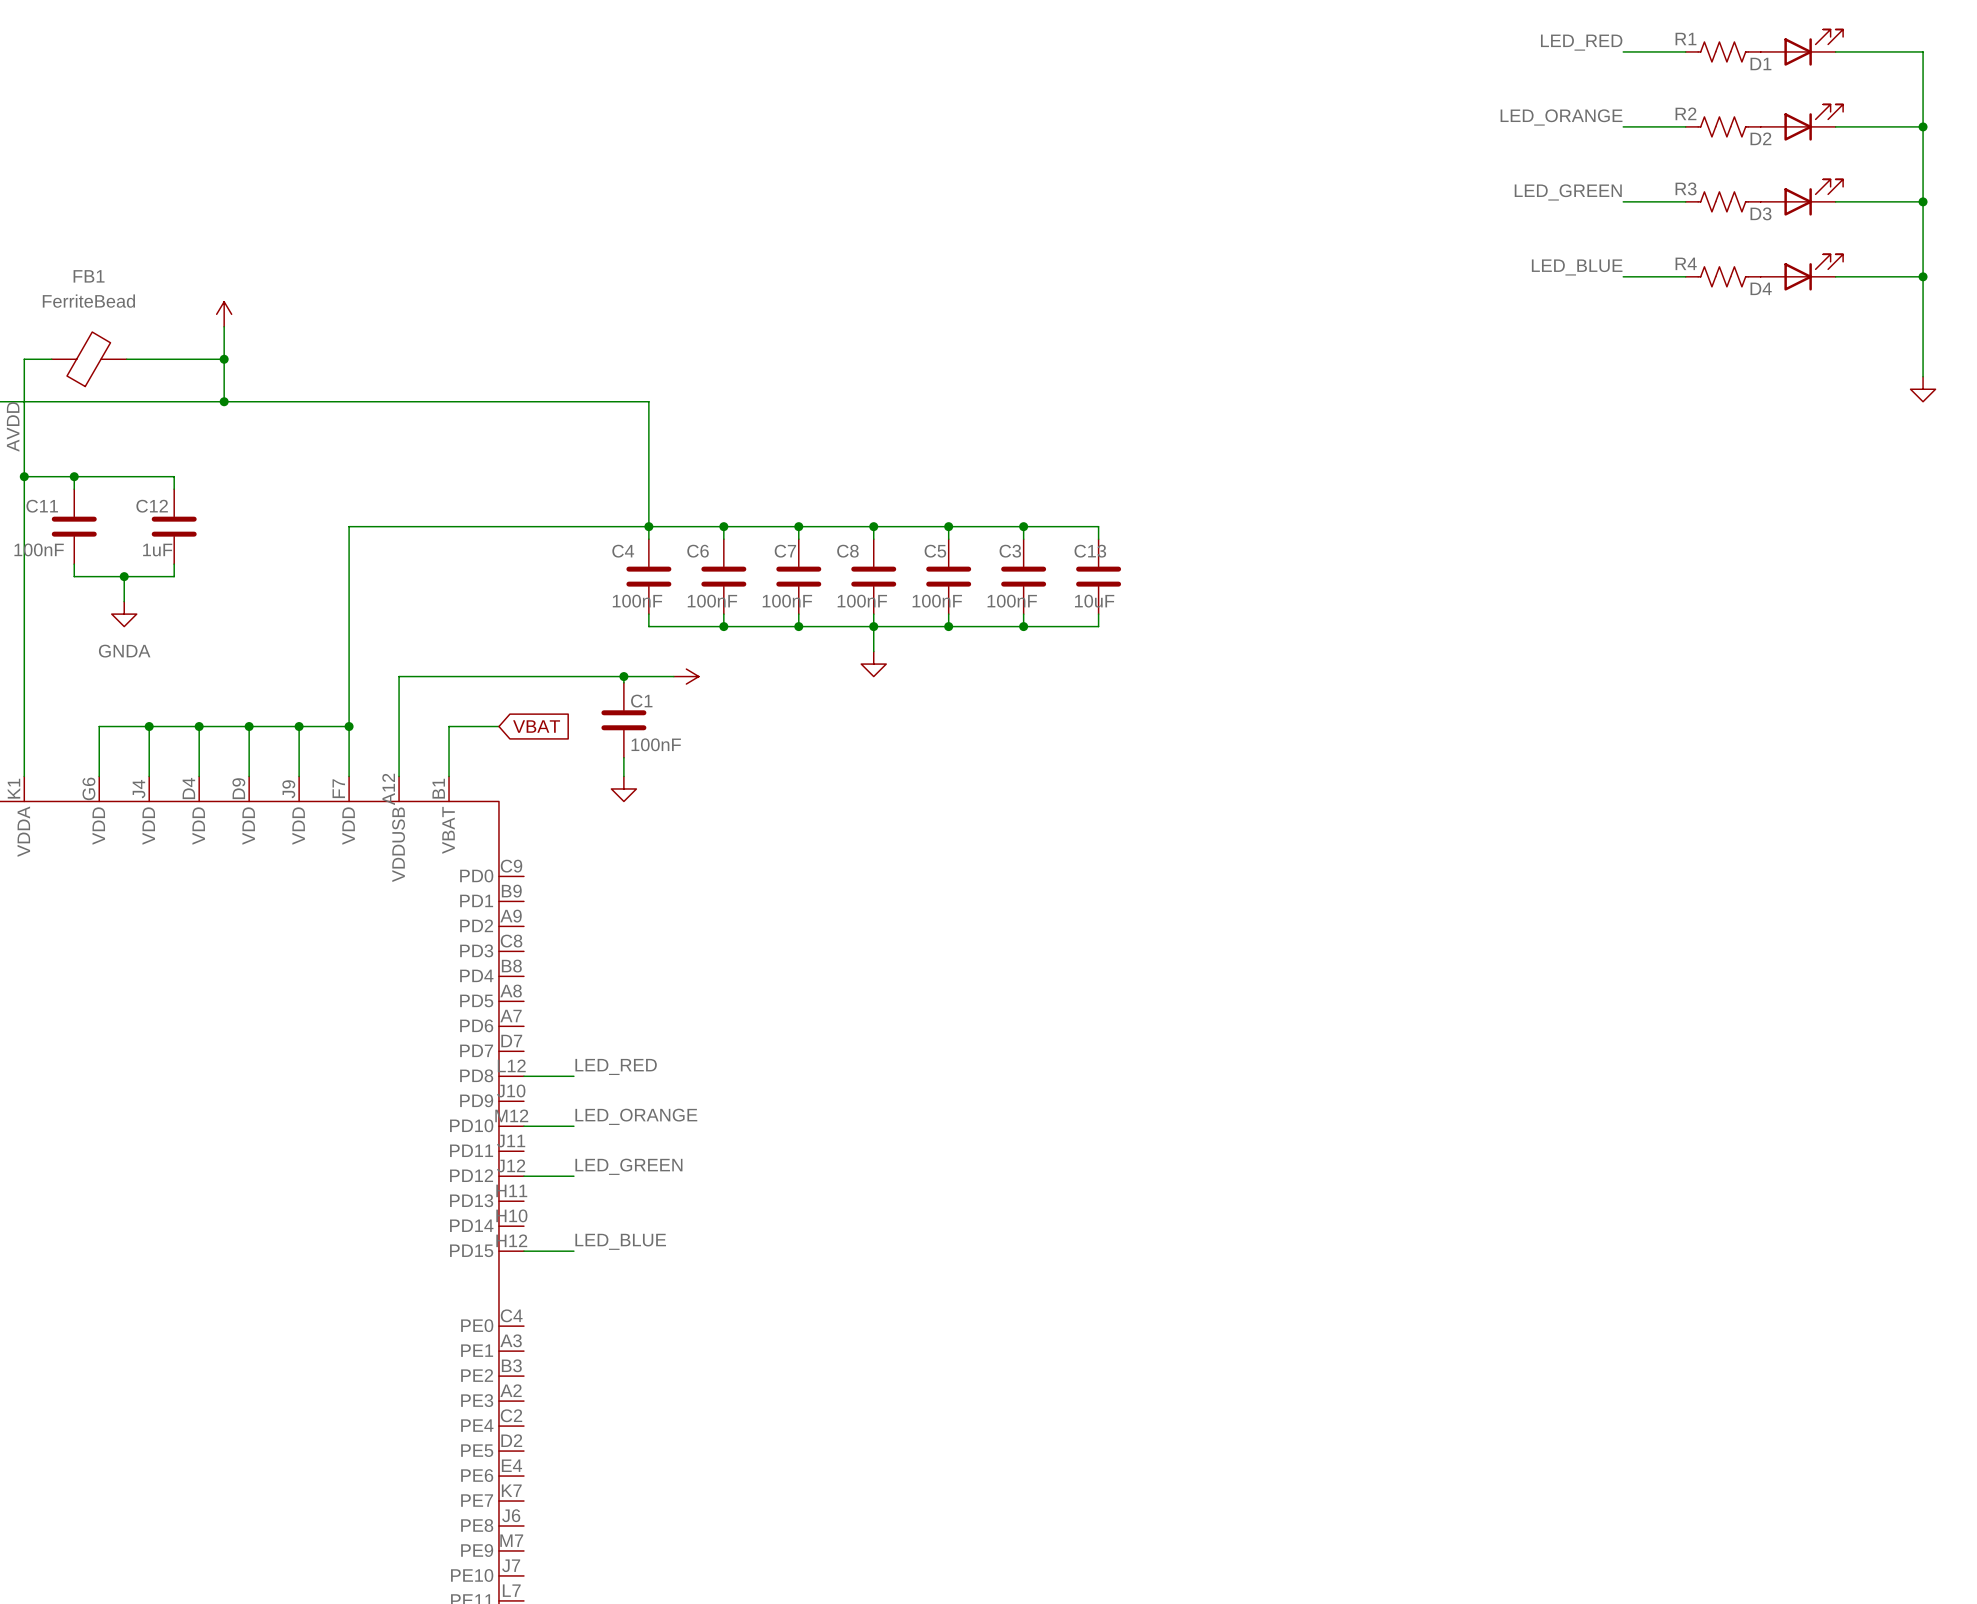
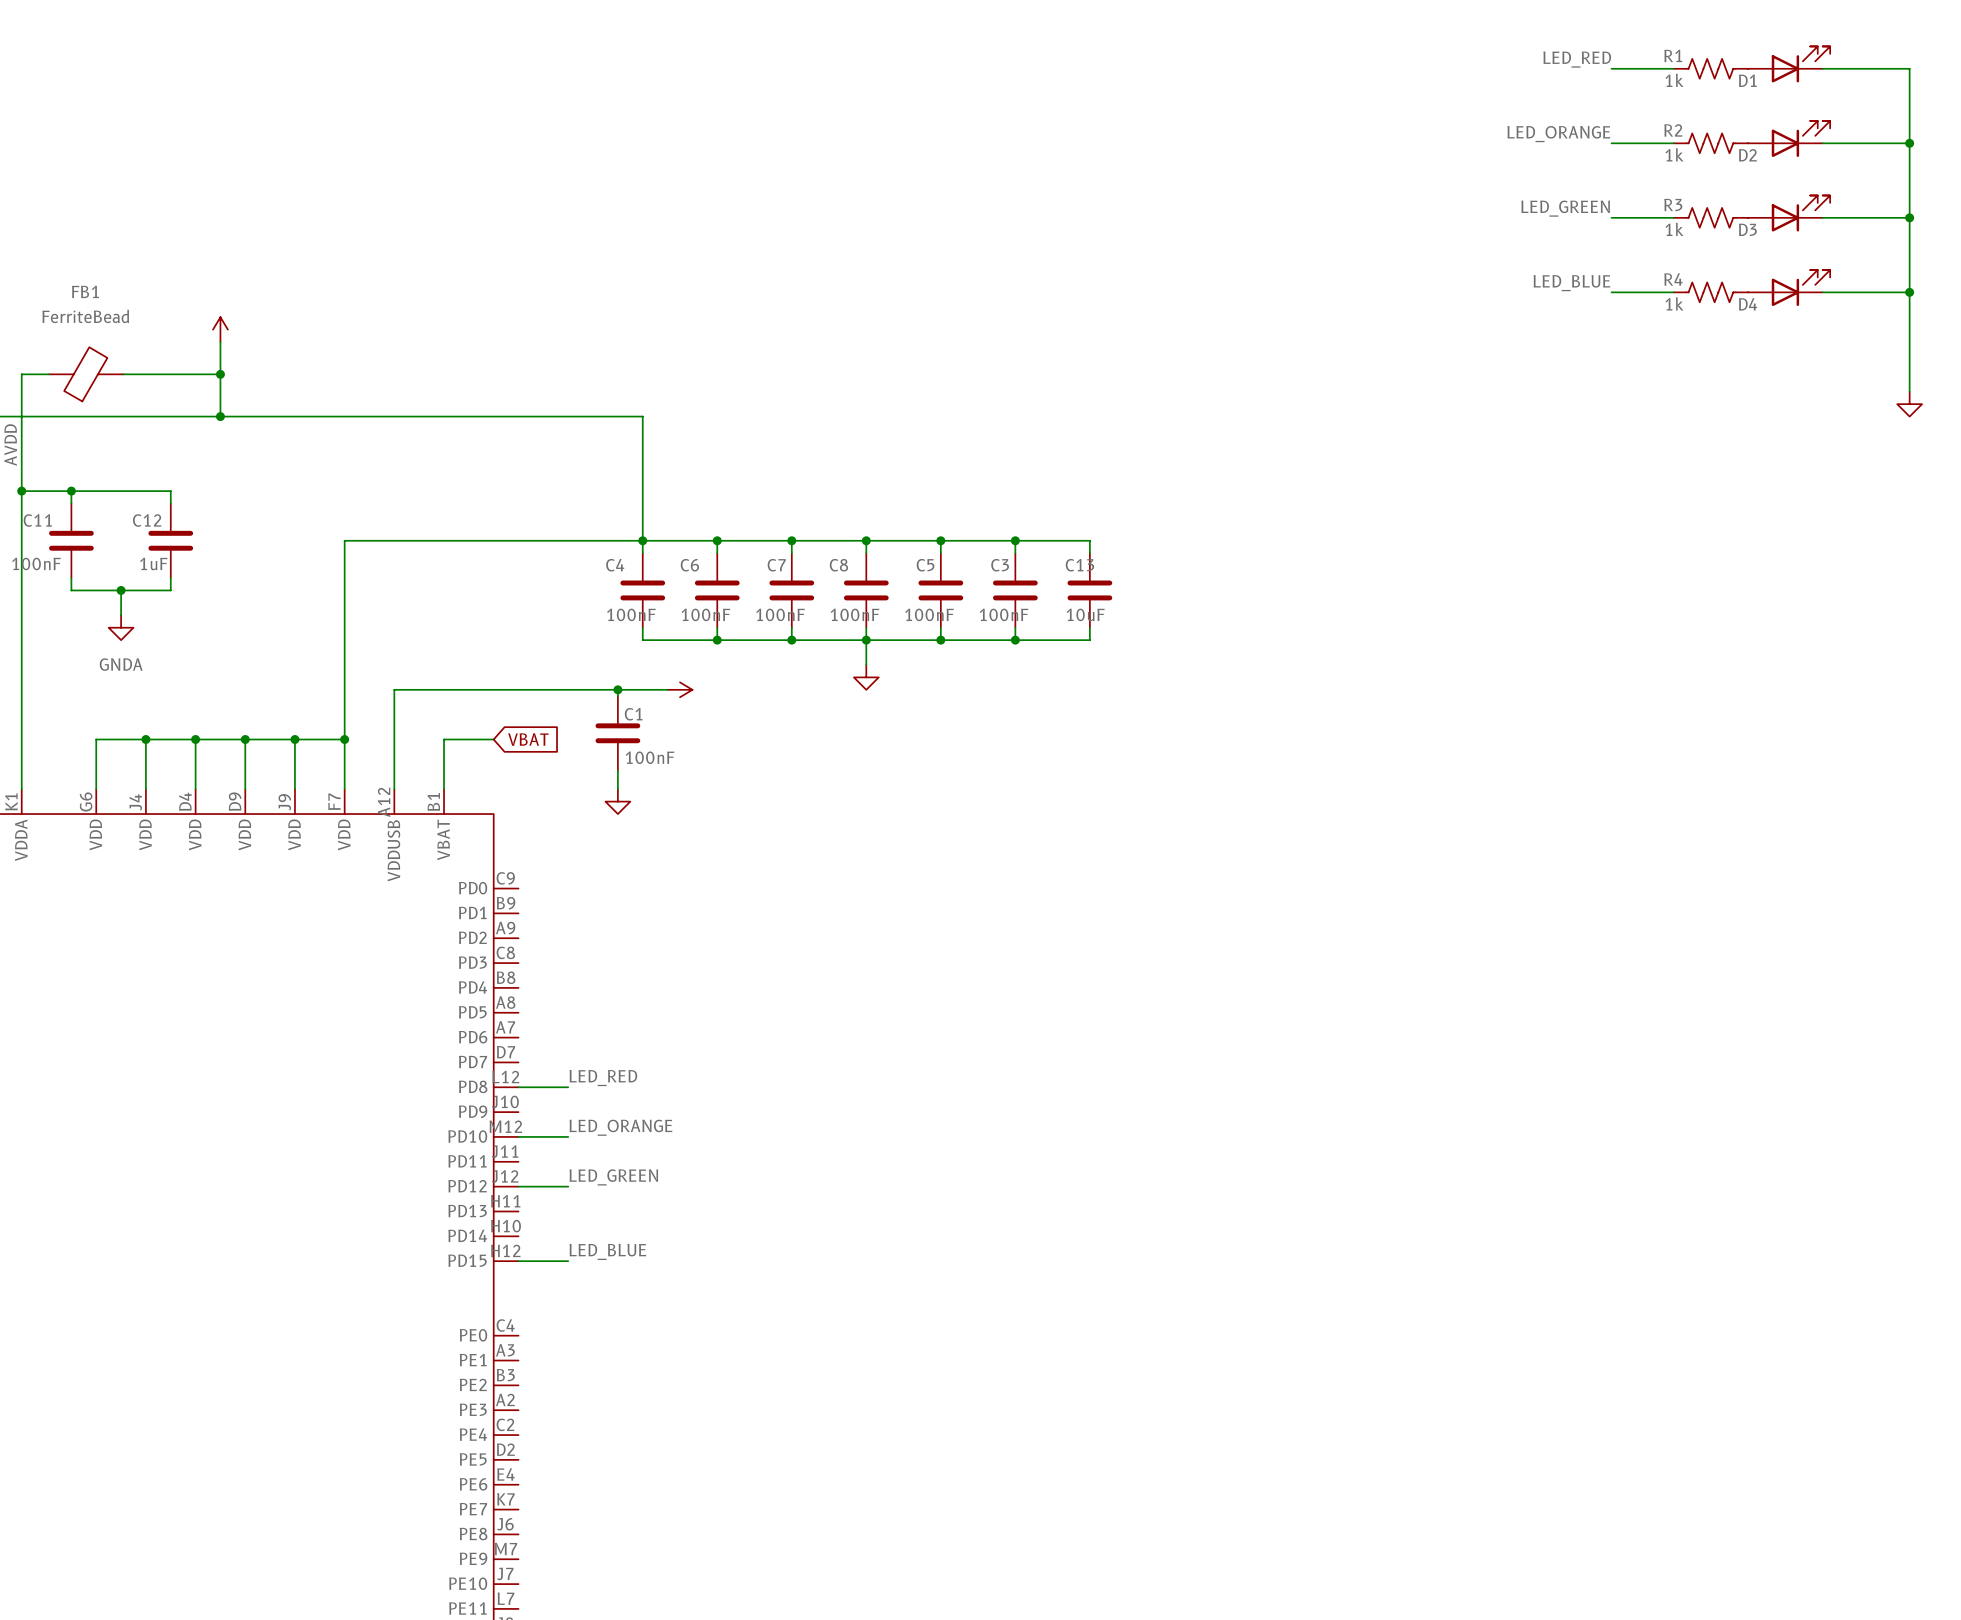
R1 value: none -> 1k (1674, 80)
R2 value: none -> 1k (1674, 154)
R3 value: none -> 1k (1674, 229)
R4 value: none -> 1k (1674, 303)

